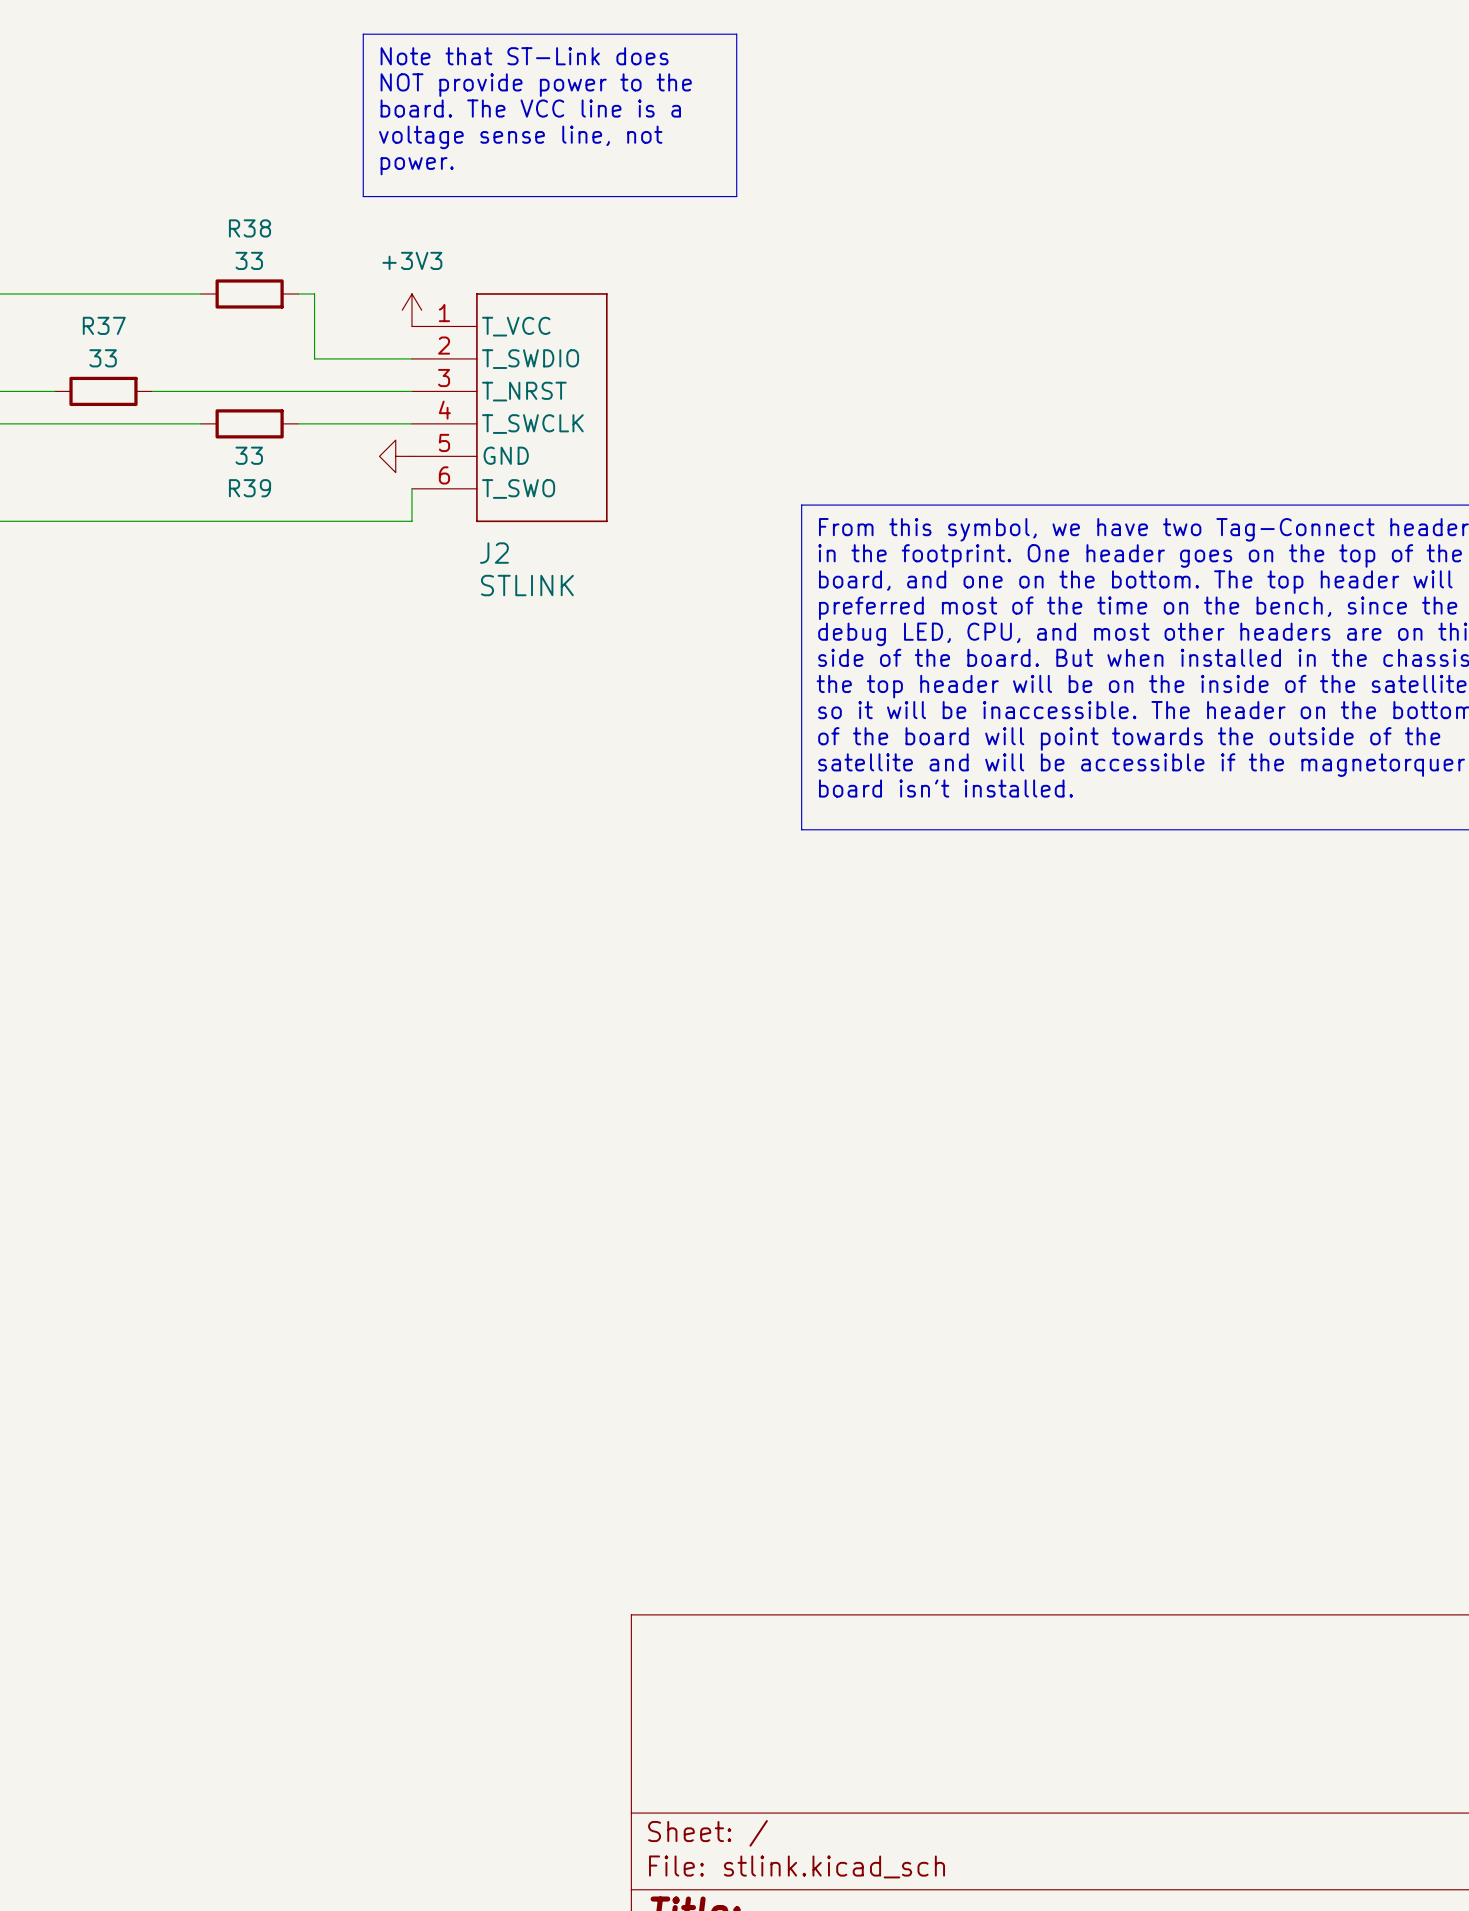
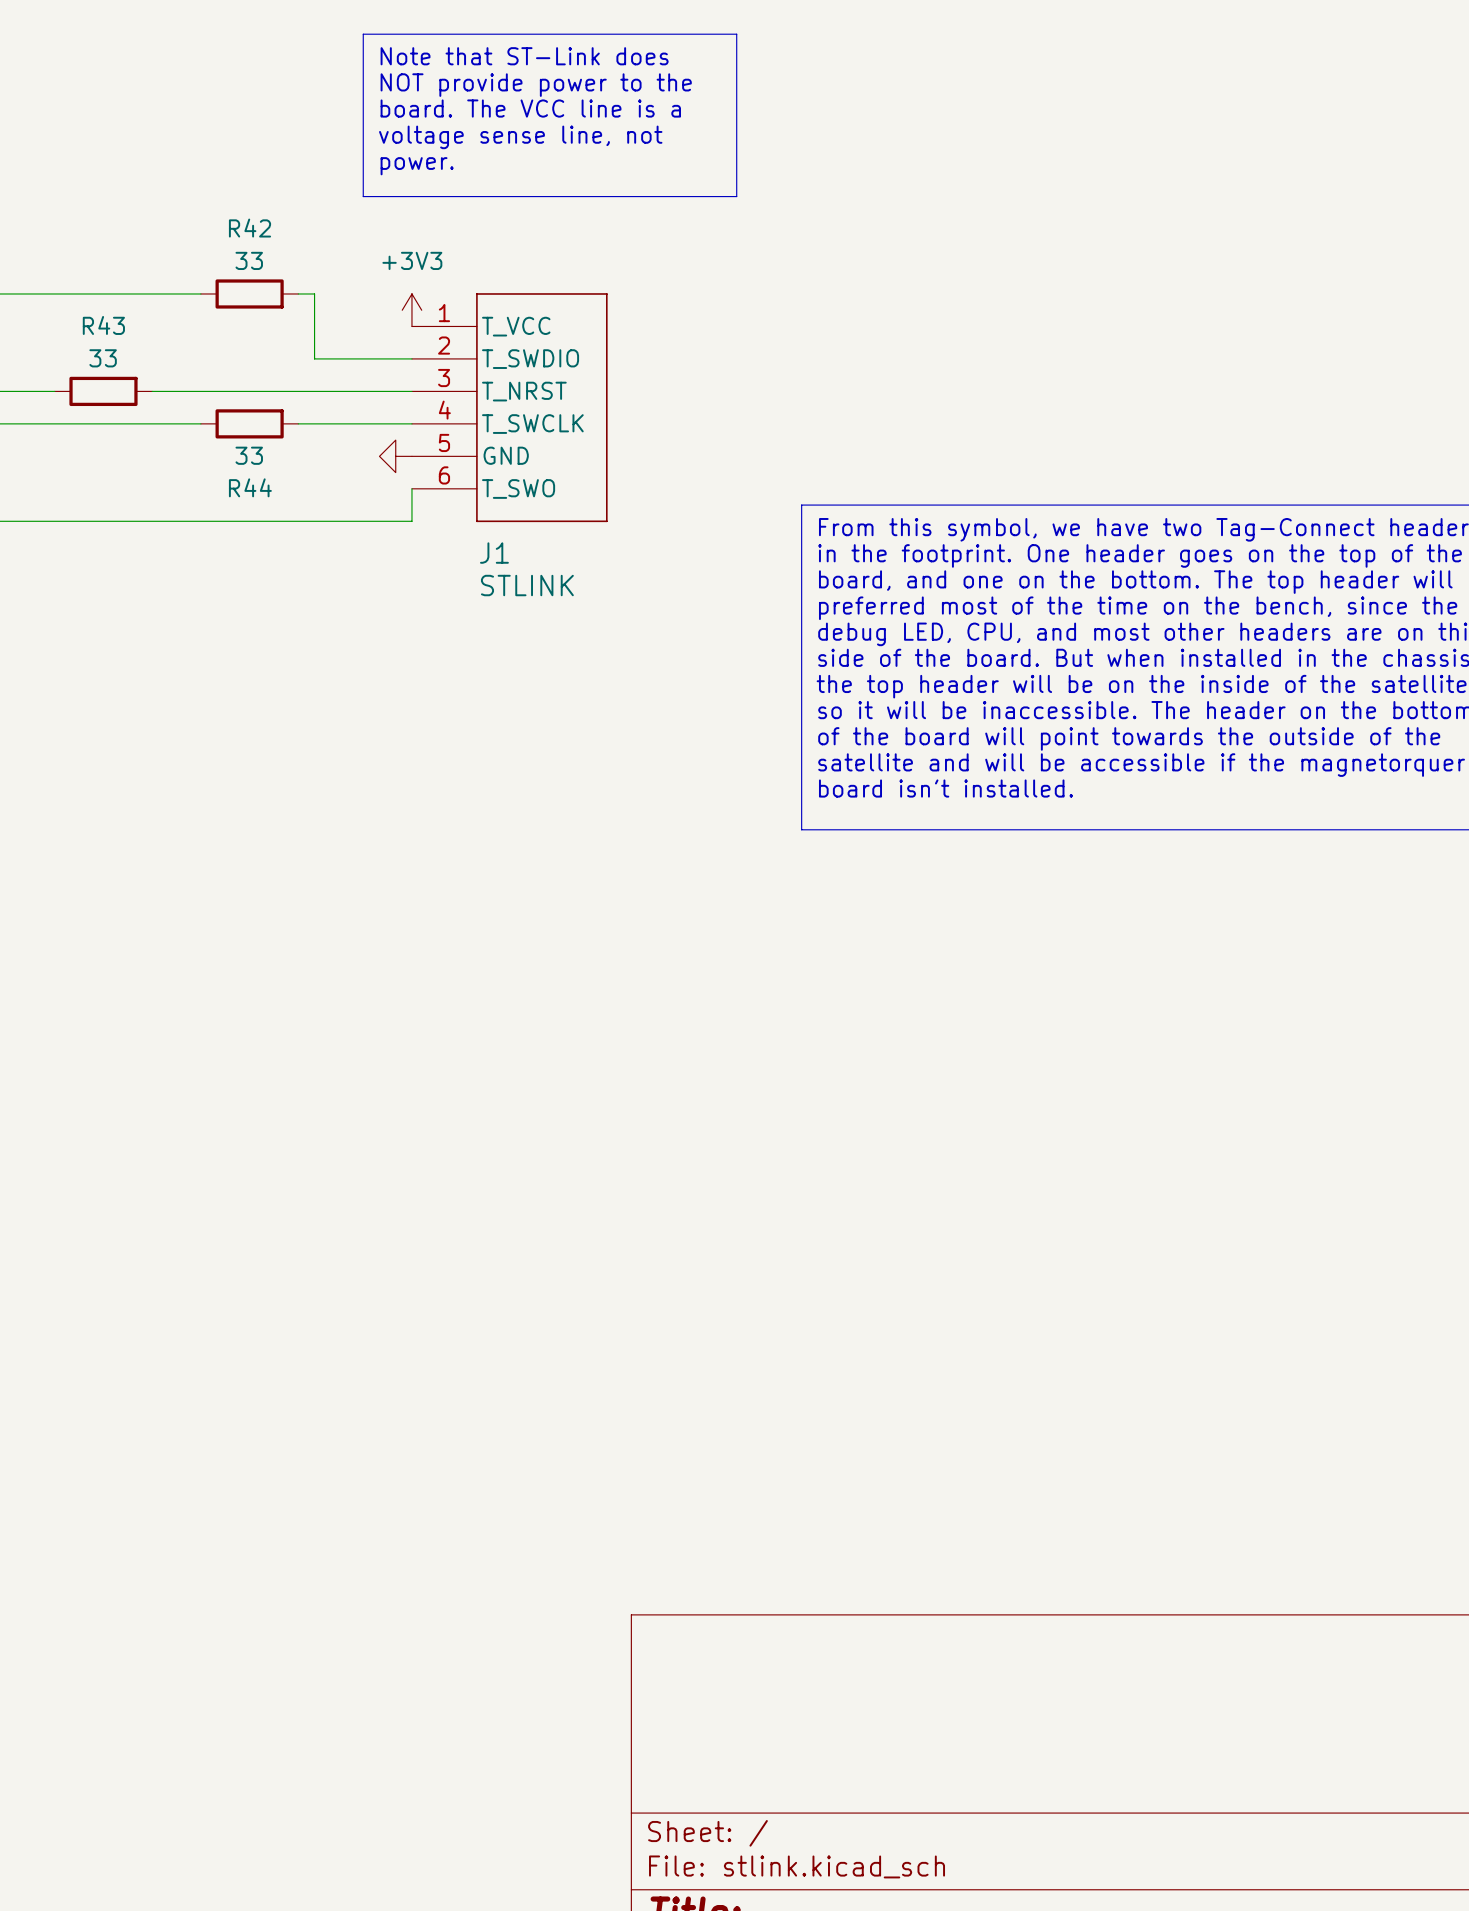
R38 name: R38 (250, 228) -> R42 (250, 228)
R37 name: R37 (104, 325) -> R43 (103, 325)
R39 name: R39 (250, 488) -> R44 (250, 487)
J2 name: J2 (494, 553) -> J1 (494, 553)

